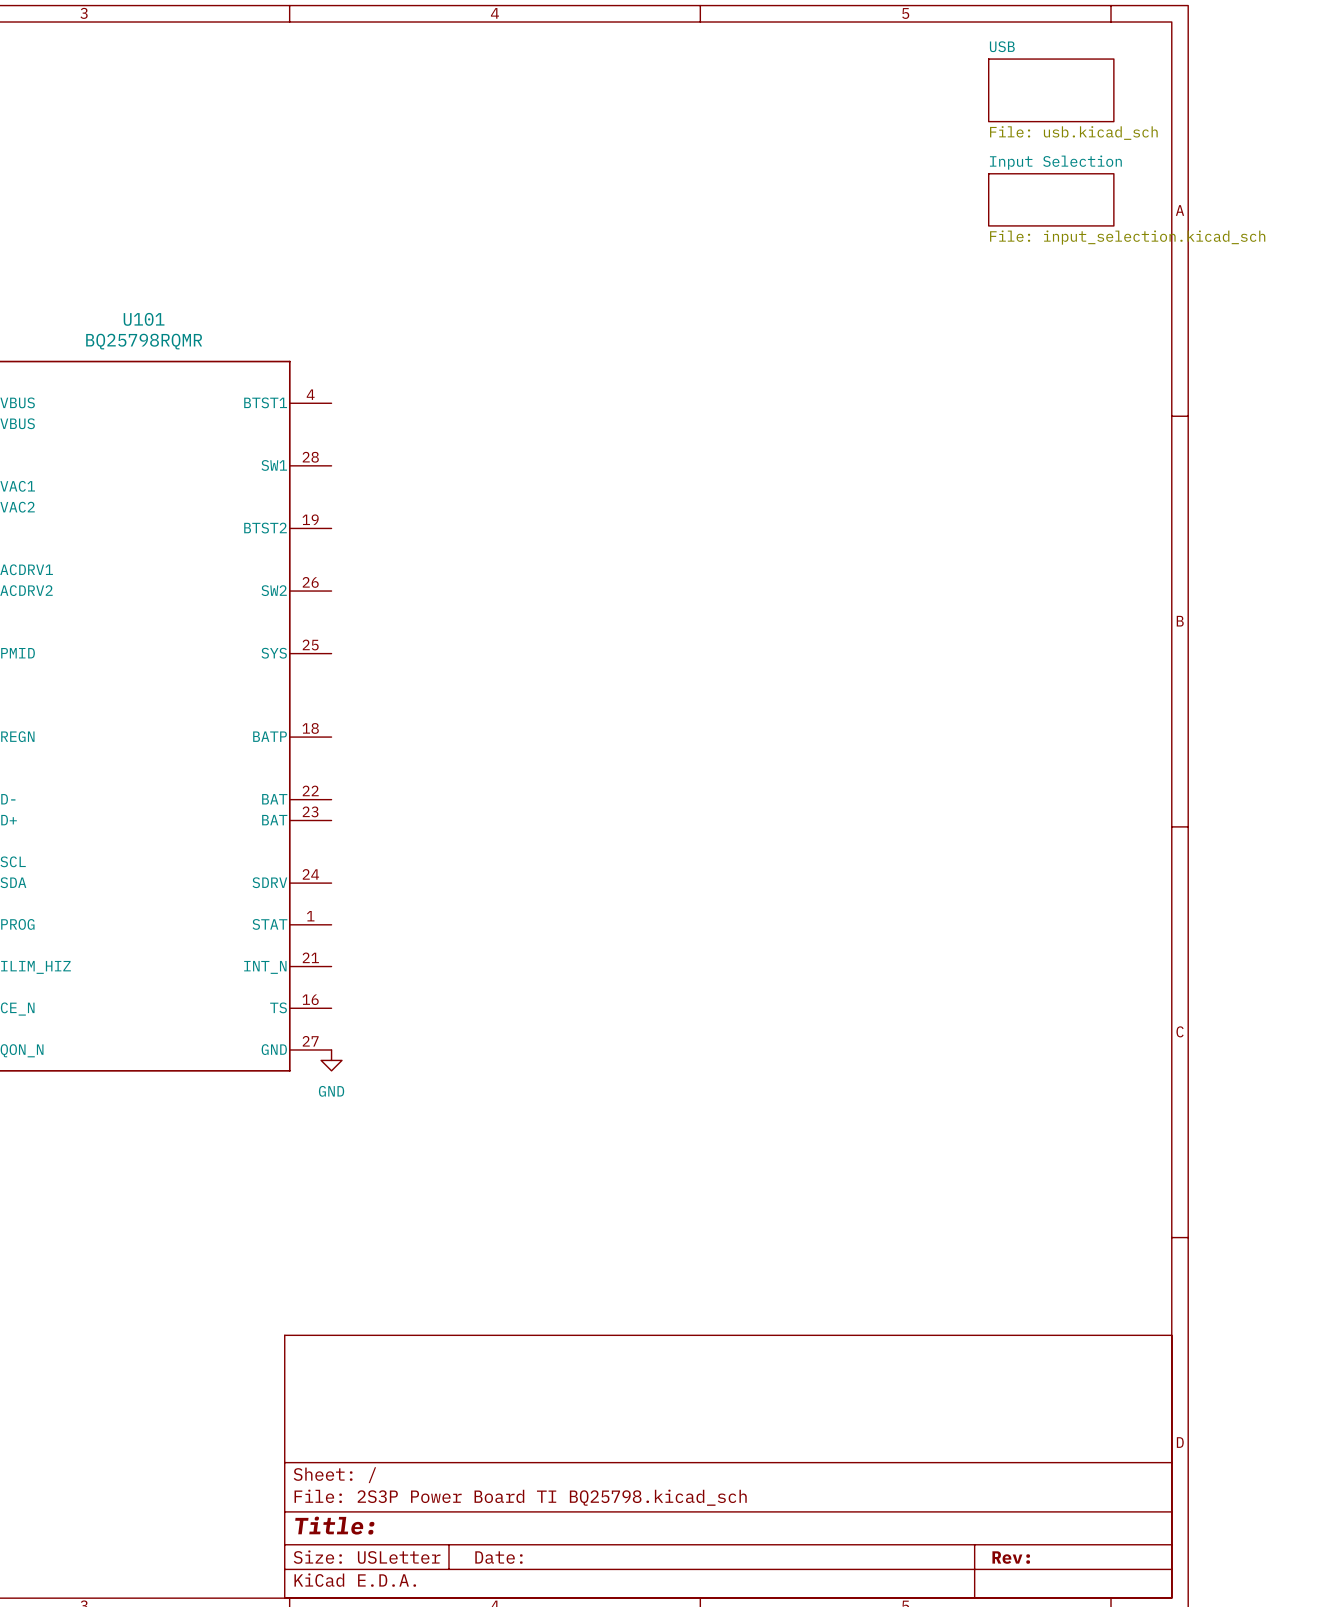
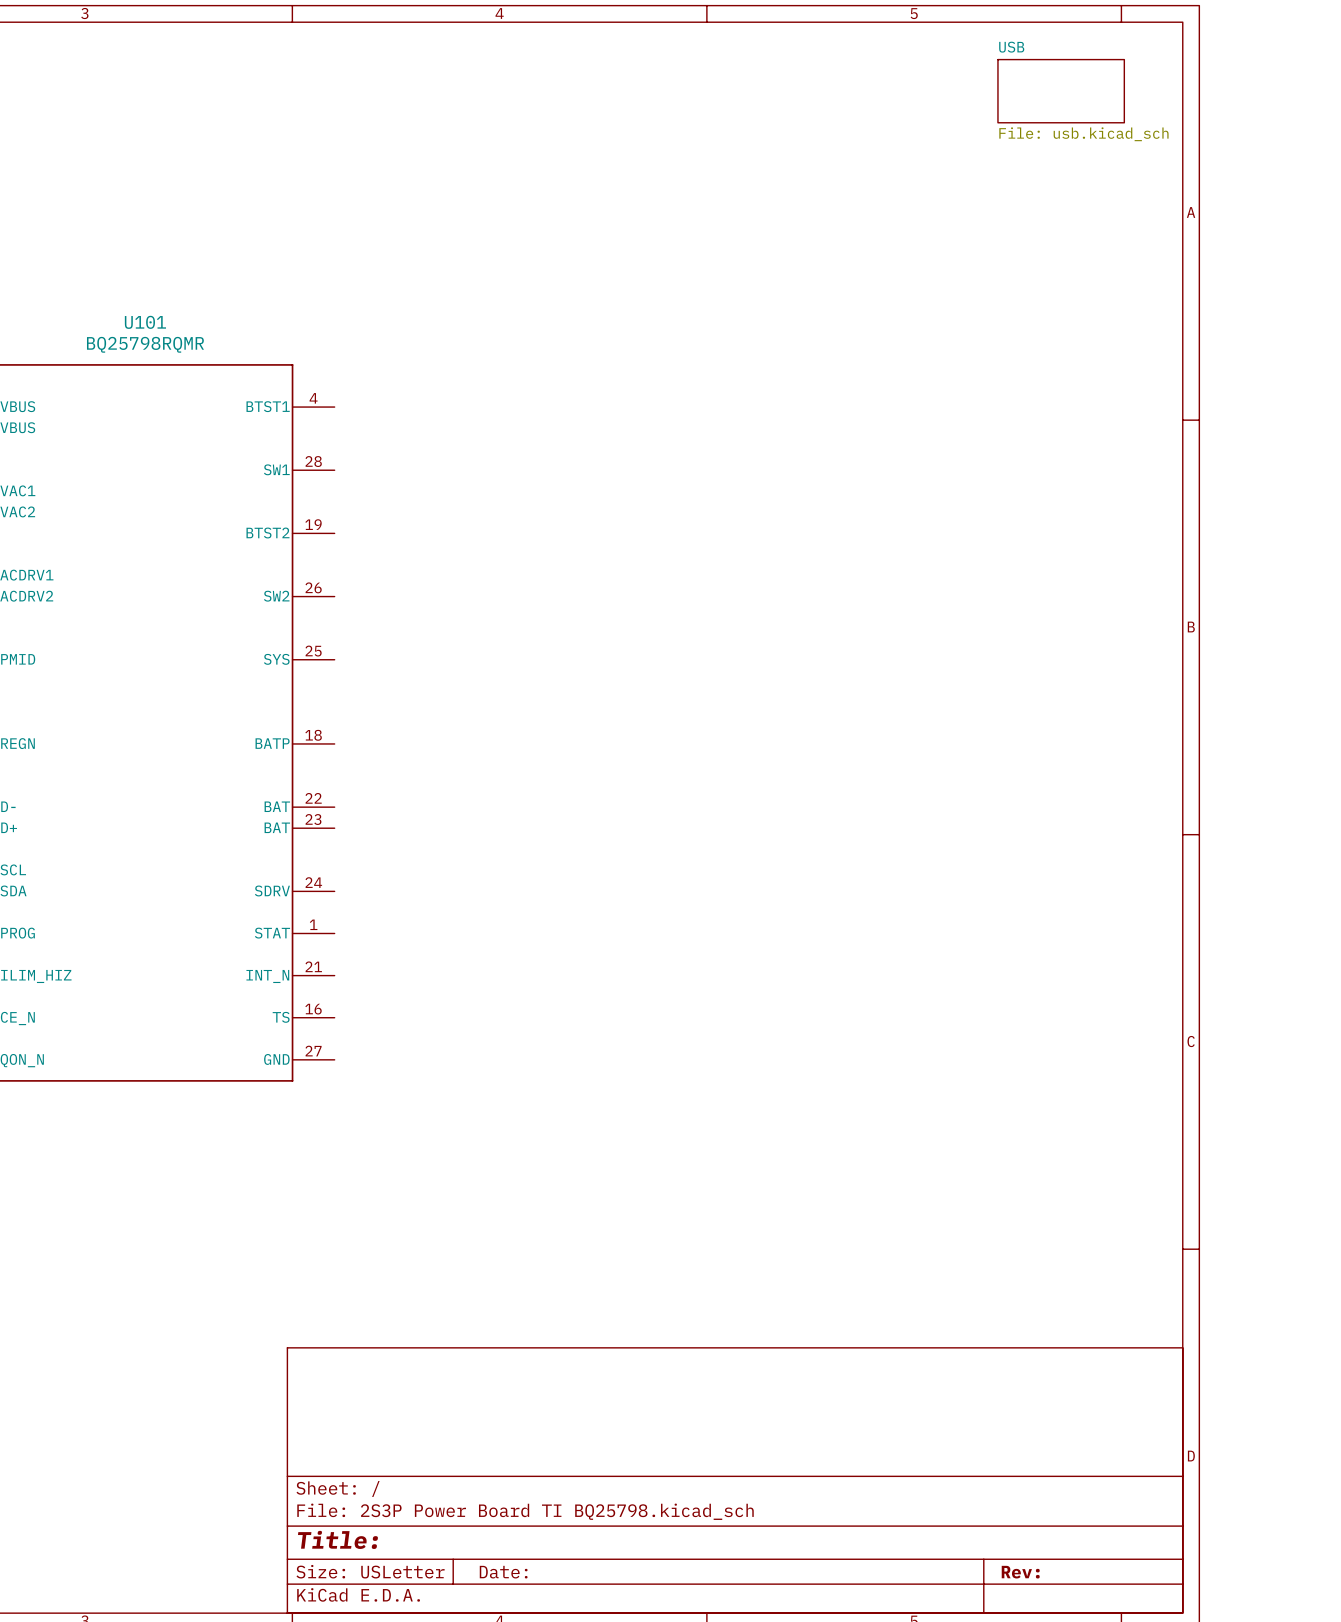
sheet Input Selection: File: input_selection.kicad_sch (1051, 199) -> none
power symbol: GND (331, 1060) -> none

